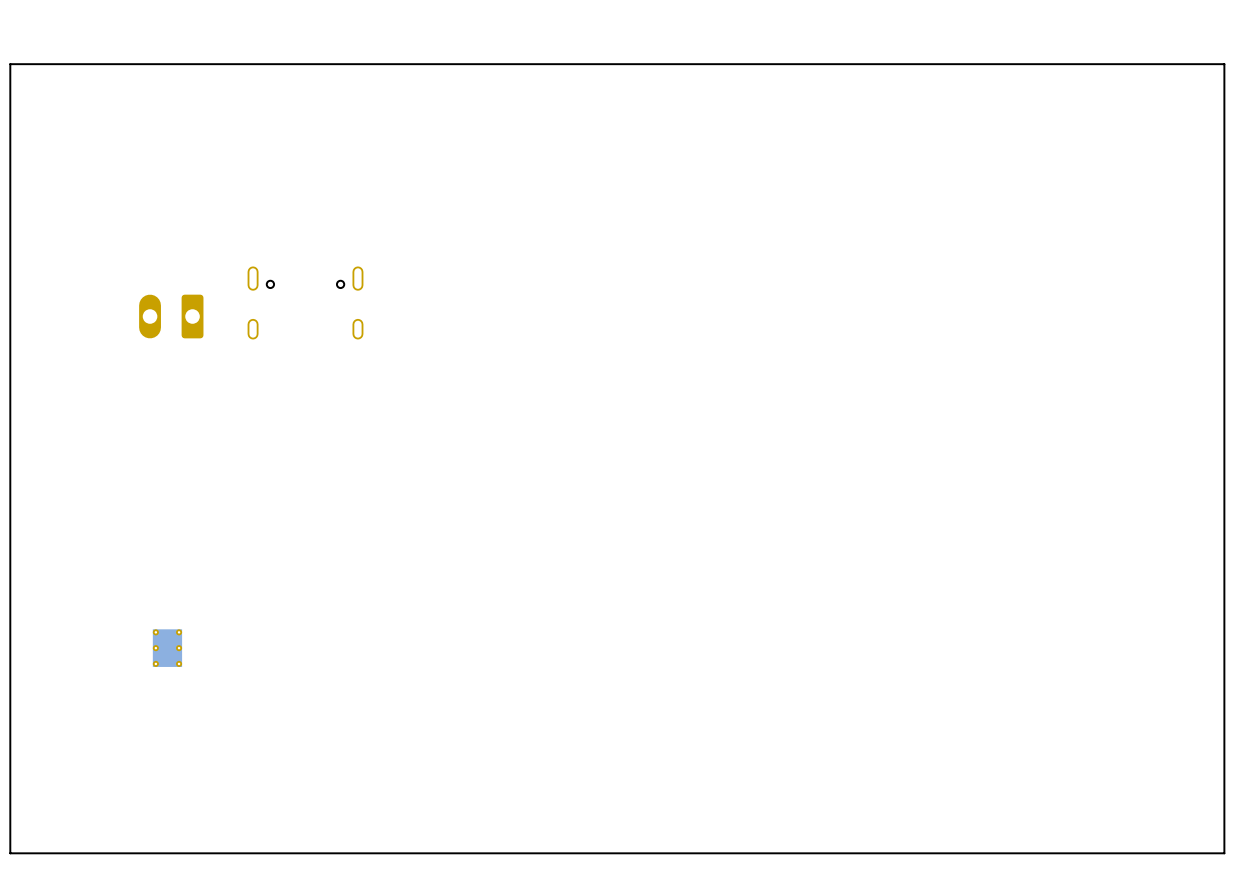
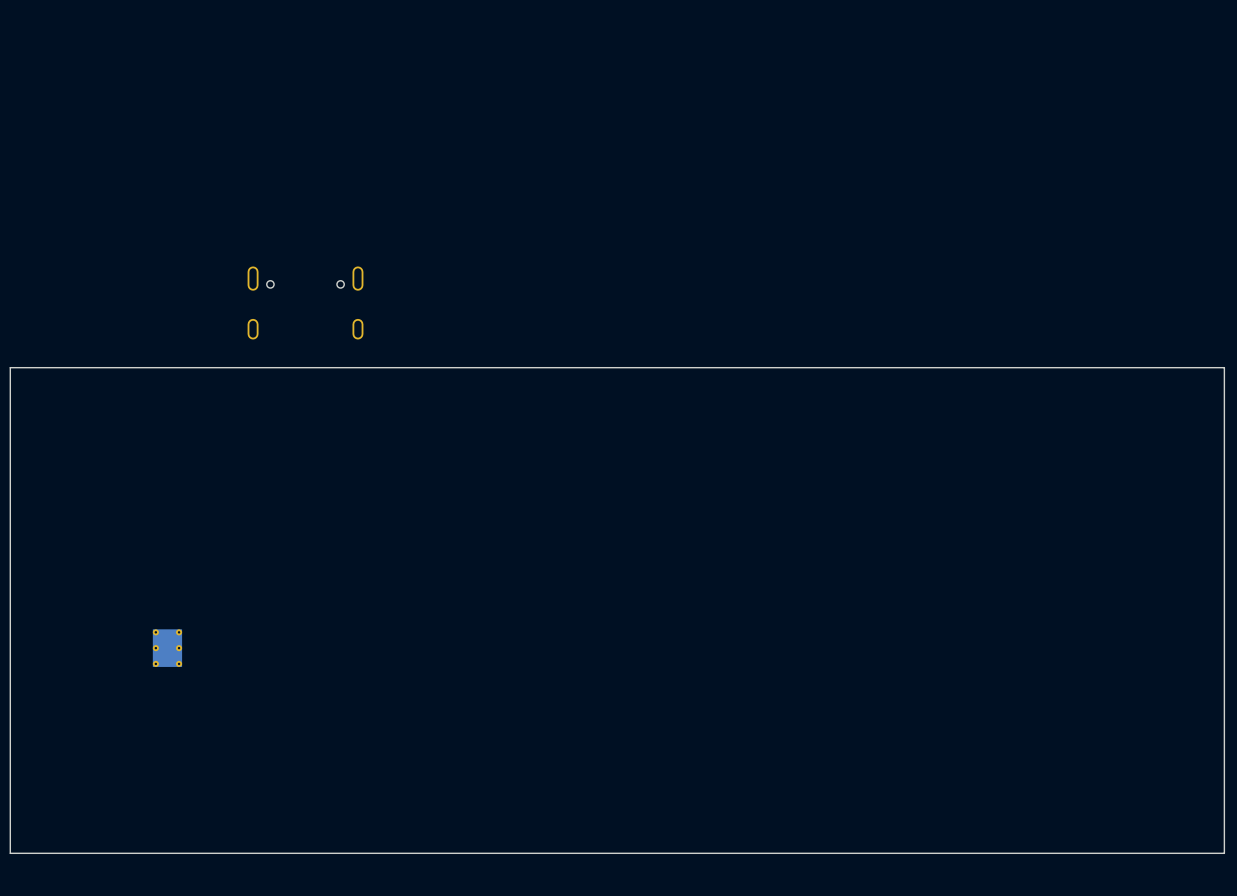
part: (171, 316) -> none
board edge: (1224, 367) (1224, 64) (10, 64) (10, 367) -> (1224, 367) (10, 367)

